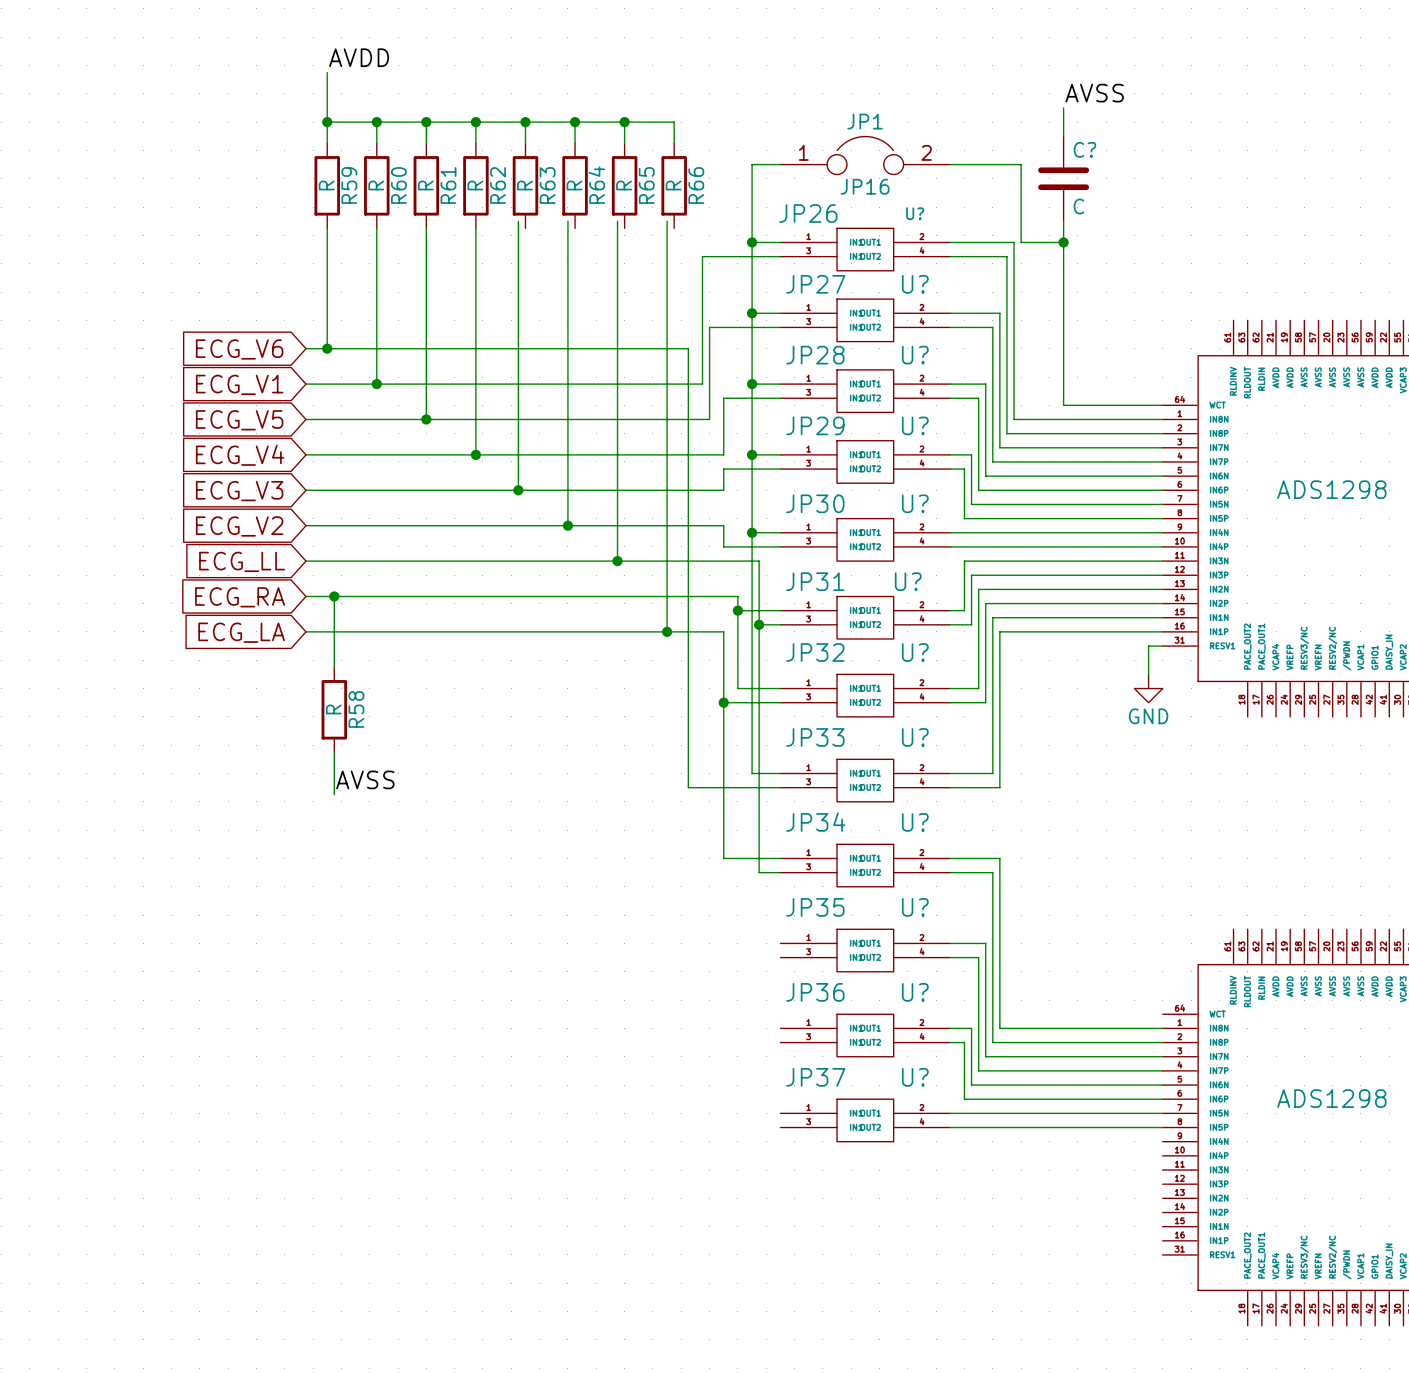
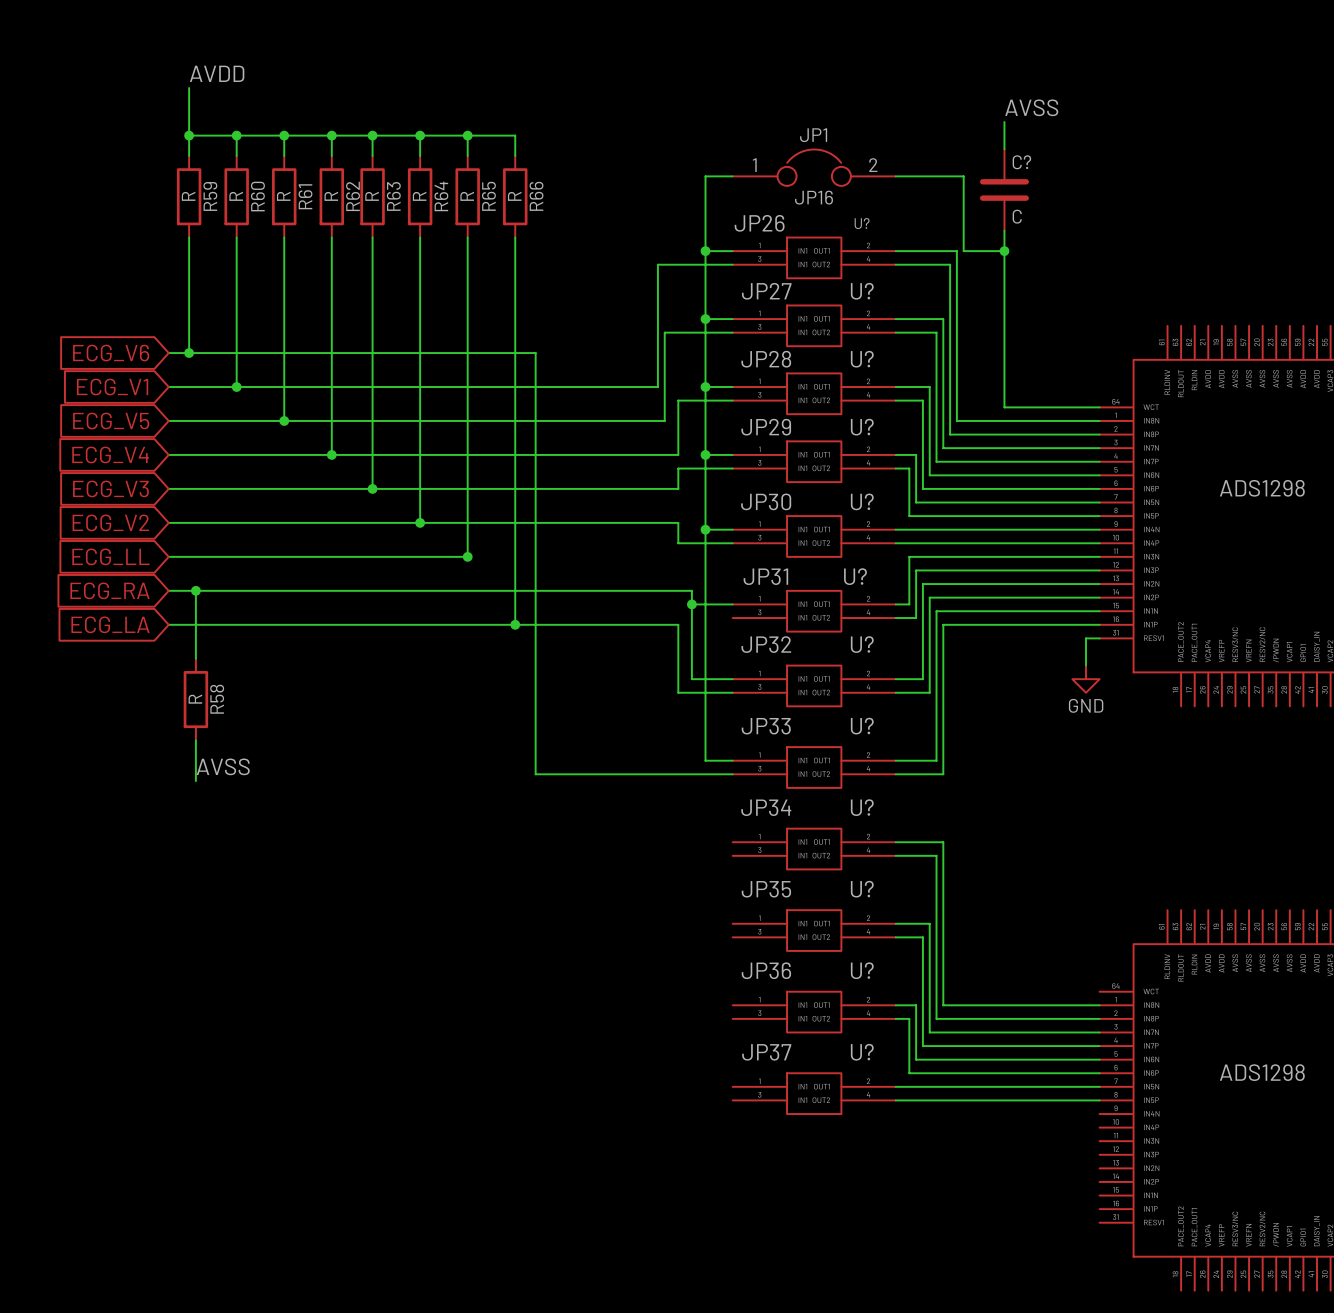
label position: AVDD (359, 57) -> AVDD (217, 73)
wire: (327, 72) (327, 143) -> (189, 88) (189, 155)
wire: none -> (189, 135) (297, 135)
junction: none -> (189, 135)
junction: none -> (236, 135)
junction position: (327, 122) -> (284, 135)
junction: none -> (331, 135)
wire: (376, 122) (376, 143) -> (236, 135) (236, 155)
junction: (376, 122) -> none
junction: none -> (372, 135)
wire: (426, 122) (426, 143) -> (284, 135) (284, 155)
junction: (426, 122) -> none
junction: none -> (420, 135)
wire: (475, 122) (475, 143) -> (331, 135) (331, 155)
junction: (475, 122) -> none
junction: none -> (467, 135)
wire: (525, 122) (525, 143) -> (467, 135) (467, 155)
junction: (525, 122) -> none
wire: (553, 122) (674, 122) (674, 143) -> (515, 135) (515, 155)
wire: (575, 122) (575, 143) -> (420, 135) (420, 155)
junction: (575, 122) -> none
wire: (624, 122) (624, 143) -> (372, 135) (372, 155)
junction: (624, 122) -> none
R59 position: (327, 185) -> (189, 196)
R60 position: (376, 185) -> (236, 196)
R61 position: (426, 185) -> (284, 196)
R62 position: (475, 185) -> (331, 196)
R63 position: (525, 185) -> (372, 196)
R64 position: (575, 185) -> (420, 196)
R65 position: (624, 185) -> (467, 196)
R66 position: (674, 185) -> (515, 196)
wire: (518, 221) (518, 490) -> none
wire: (567, 221) (567, 525) -> none
wire: (617, 221) (617, 561) -> none
wire: (667, 221) (667, 631) -> none
wire: (327, 228) (327, 348) -> (189, 237) (189, 353)
wire: (376, 228) (376, 384) -> (236, 237) (236, 387)
wire: none -> (372, 237) (372, 488)
wire: (426, 228) (426, 419) -> (284, 237) (284, 420)
wire: none -> (420, 237) (420, 522)
wire: (475, 228) (475, 454) -> (331, 237) (331, 454)
wire: none -> (515, 237) (515, 624)
wire: none -> (168, 353) (277, 353)
junction: none -> (189, 353)
junction: (327, 348) -> none
wire: (575, 348) (688, 348) (688, 787) -> (535, 353) (535, 774) (644, 774)
global label position: ECG_V6 (239, 349) -> ECG_V6 (111, 353)
wire: none -> (168, 387) (277, 387)
global label position: ECG_V1 (239, 384) -> ECG_V1 (112, 387)
junction: none -> (236, 387)
junction: (376, 384) -> none
wire: none -> (168, 420) (277, 420)
junction: none -> (284, 420)
junction: (426, 419) -> none
global label position: ECG_V5 (239, 420) -> ECG_V5 (111, 420)
wire: none -> (168, 454) (277, 454)
junction: none -> (331, 454)
junction: (475, 454) -> none
global label position: ECG_V4 (240, 455) -> ECG_V4 (110, 454)
wire: none -> (168, 488) (277, 488)
junction: none -> (372, 488)
junction: (518, 490) -> none
global label position: ECG_V3 (239, 491) -> ECG_V3 (110, 488)
wire: none -> (168, 522) (277, 522)
junction: none -> (420, 522)
junction: (567, 525) -> none
global label position: ECG_V2 (239, 526) -> ECG_V2 (110, 522)
wire: none -> (168, 556) (277, 556)
global label position: ECG_LL (242, 561) -> ECG_LL (110, 556)
wire: (504, 561) (759, 561) (759, 872) (780, 872) -> (467, 556) (467, 237)
junction: none -> (467, 556)
junction: (617, 561) -> none
wire: none -> (168, 590) (277, 590)
junction: none -> (195, 590)
wire: (334, 596) (334, 667) -> (195, 590) (195, 658)
junction: (334, 596) -> none
global label position: ECG_RA (240, 597) -> ECG_RA (109, 590)
wire: (759, 624) (780, 624) -> none
junction: (759, 624) -> none
wire: none -> (168, 624) (277, 624)
junction: none -> (515, 624)
junction: (667, 631) -> none
global label position: ECG_LA (241, 632) -> ECG_LA (110, 624)
wire: (723, 702) (723, 858) (780, 858) -> none
junction: (723, 702) -> none
R58 position: (334, 709) -> (195, 699)
wire: (334, 752) (334, 794) -> (195, 740) (195, 781)
label position: AVSS (365, 779) -> AVSS (223, 766)

